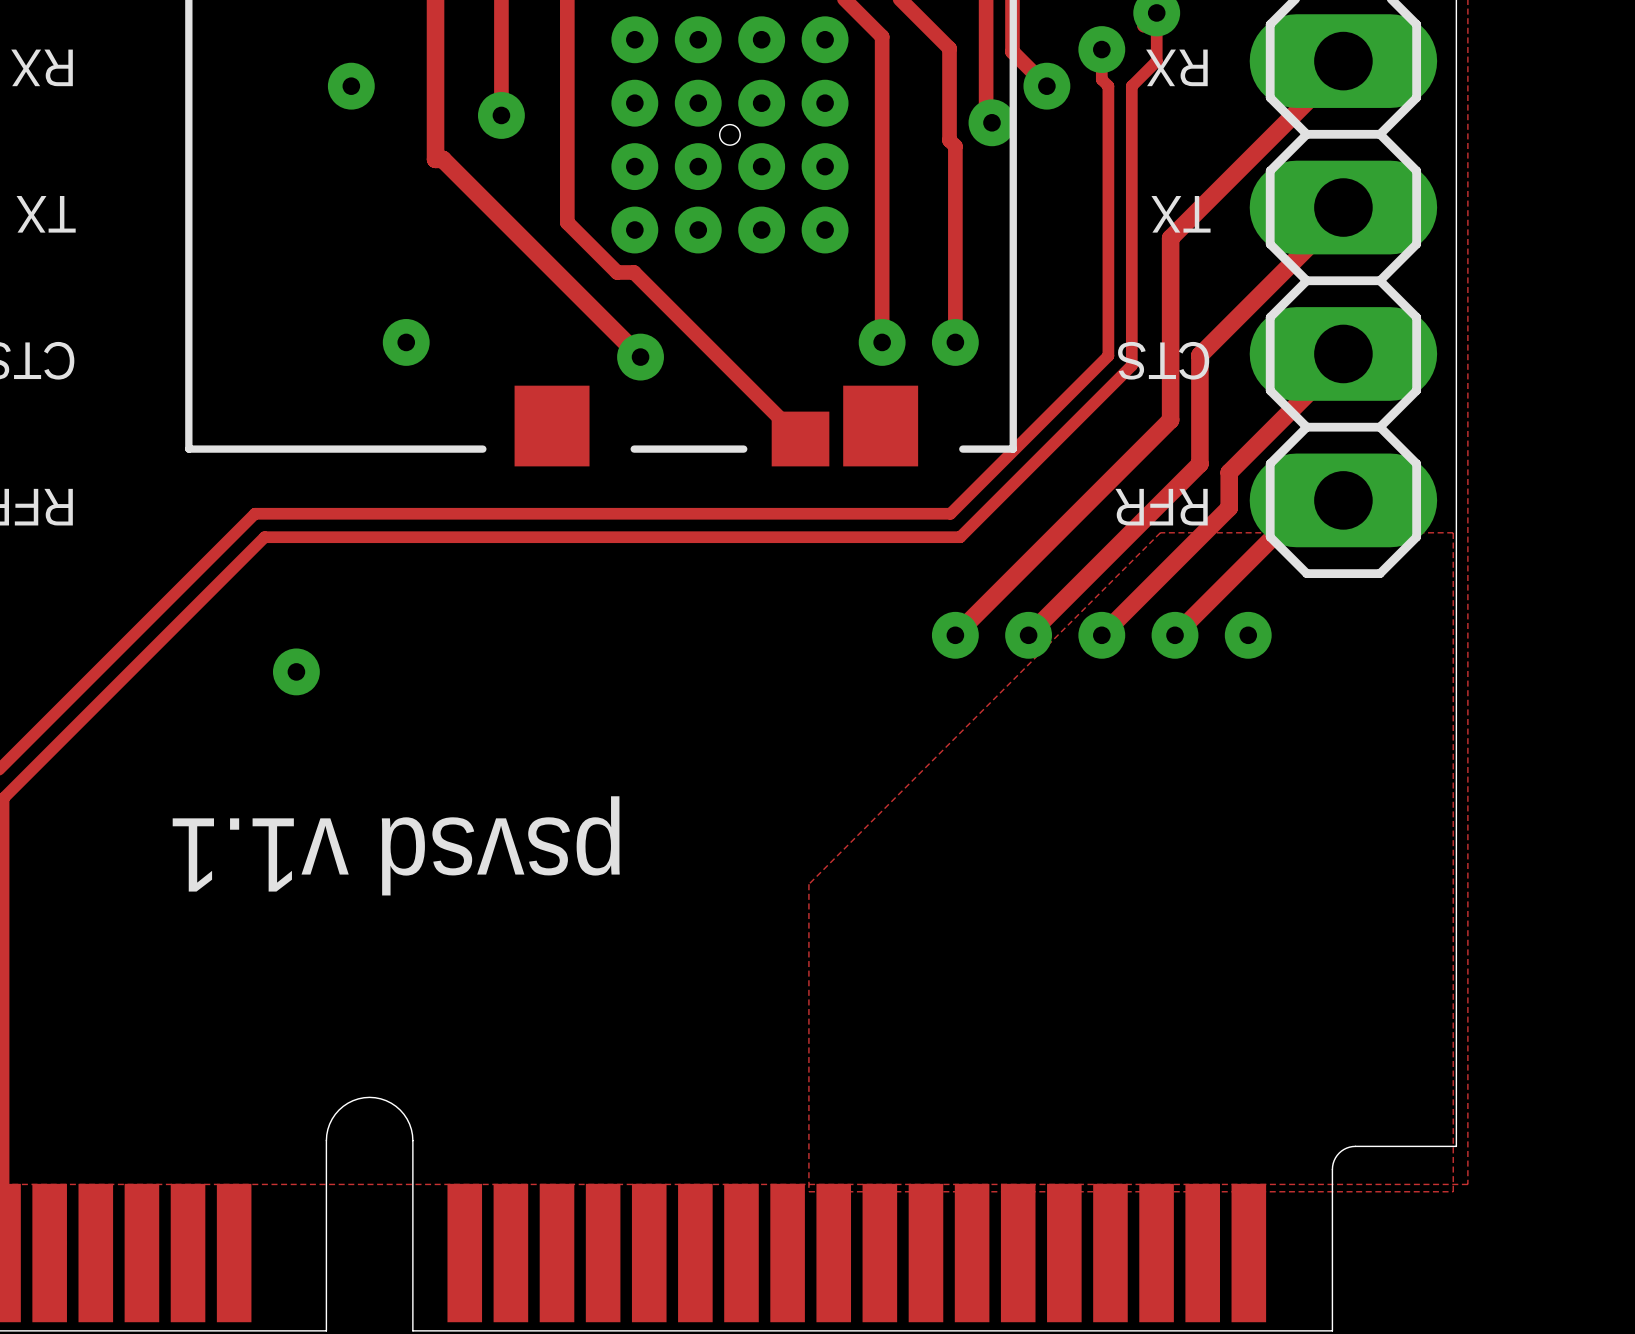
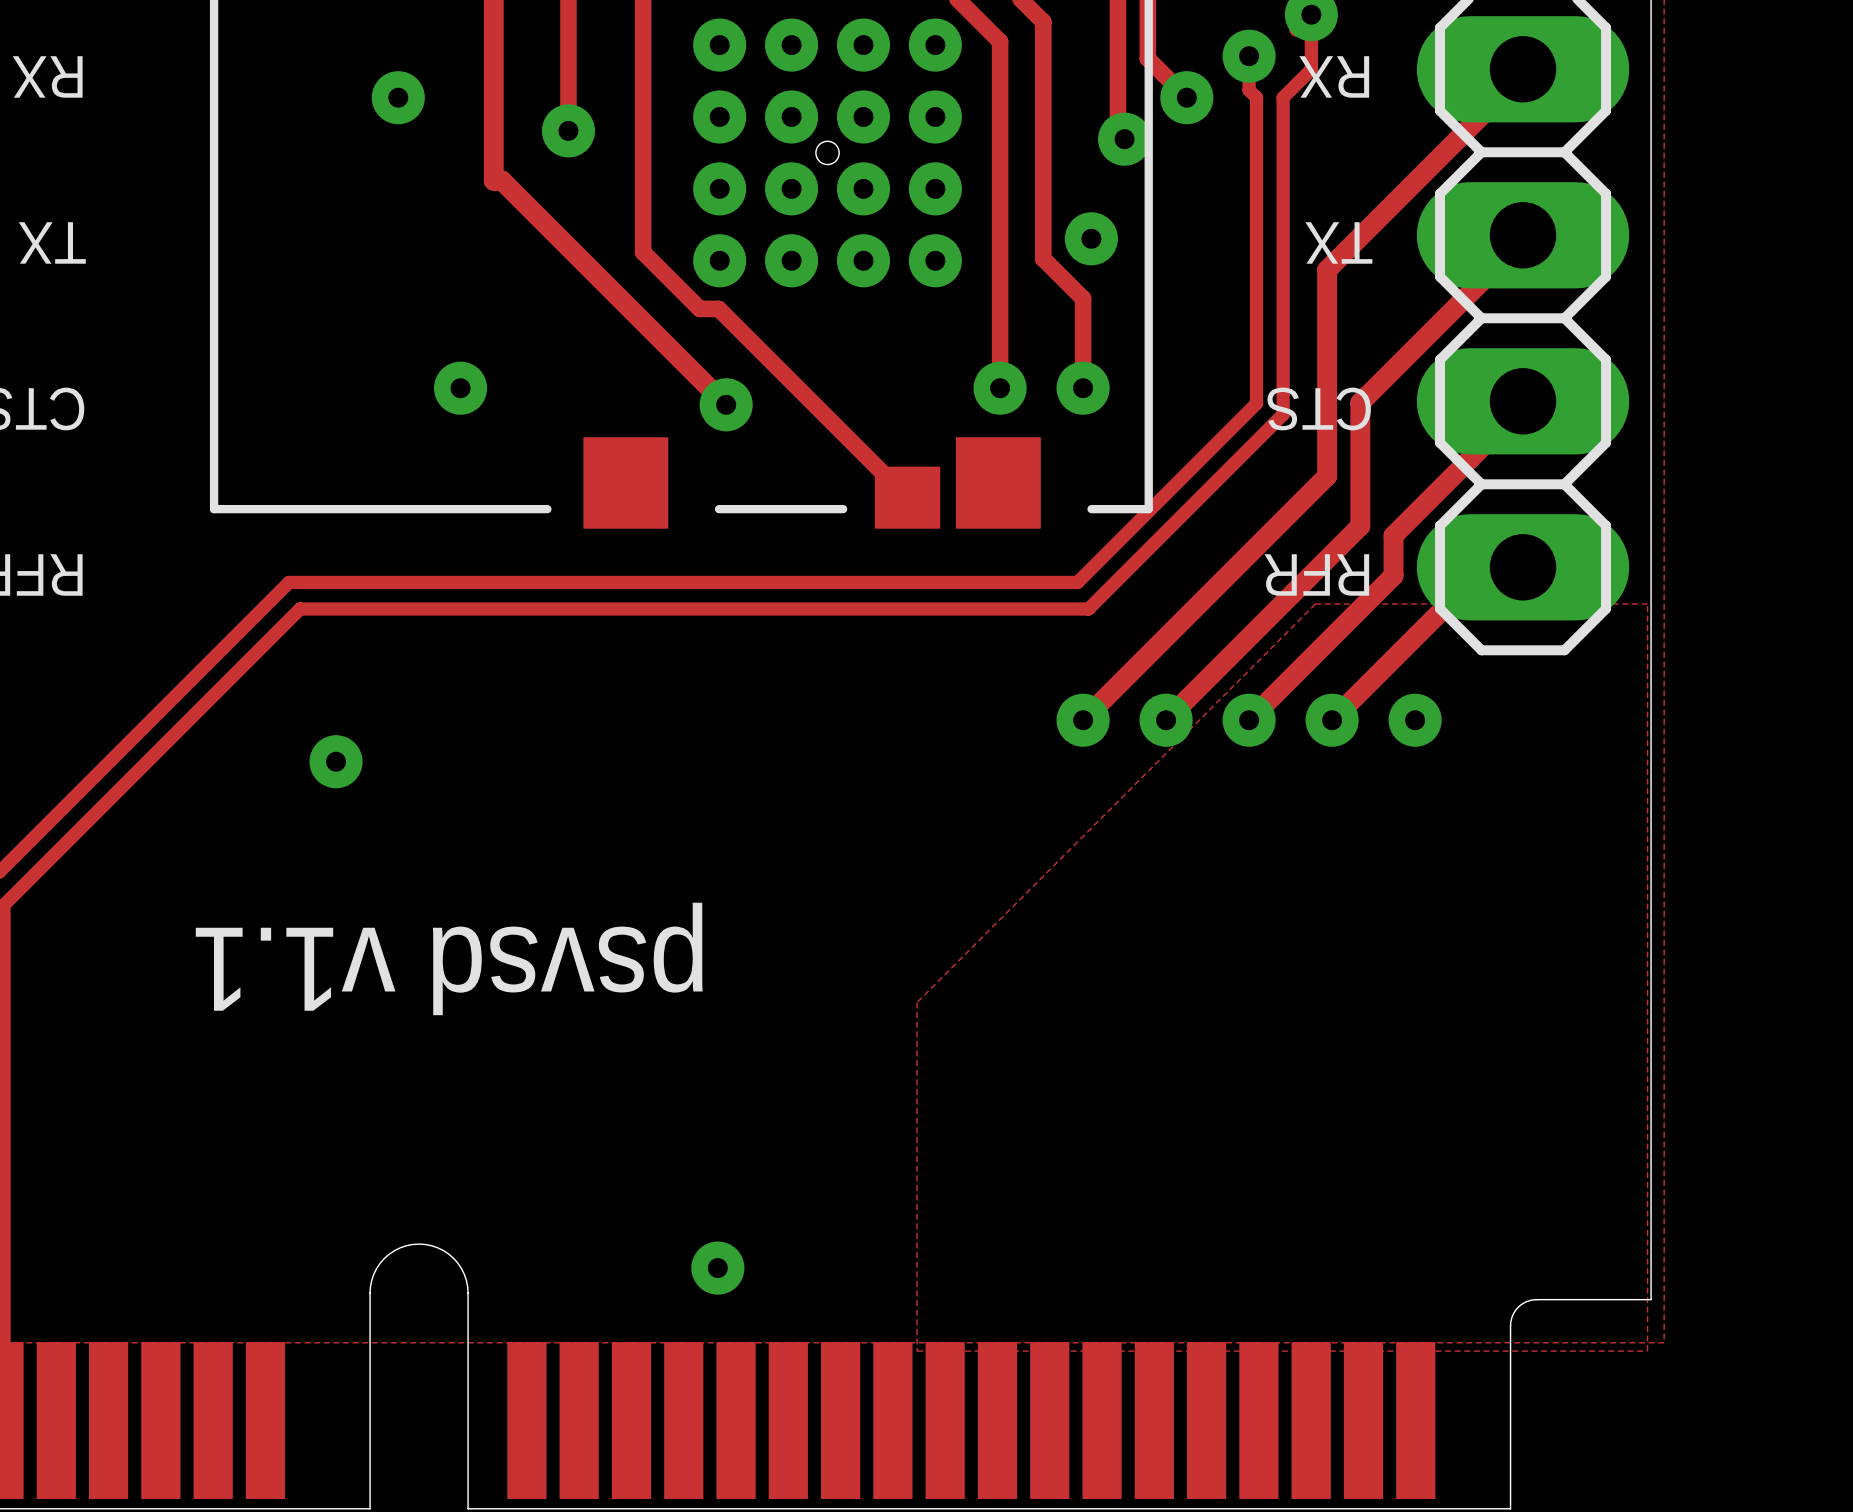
track: (920, 19) (949, 48) (949, 140) (955, 146) (955, 263) -> (1043, 21) (1043, 258) (1083, 298)
via: none -> (1091, 238)
via: none -> (717, 1268)

